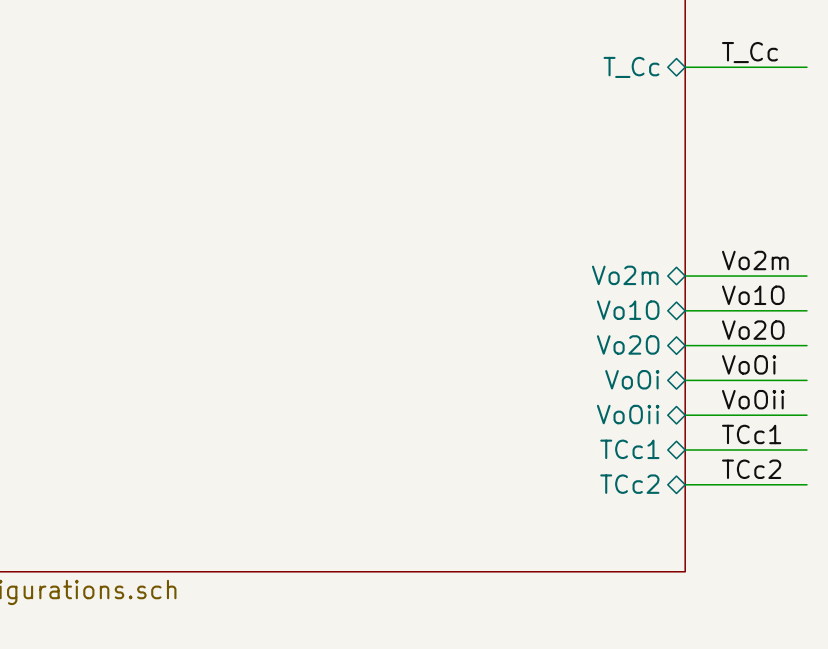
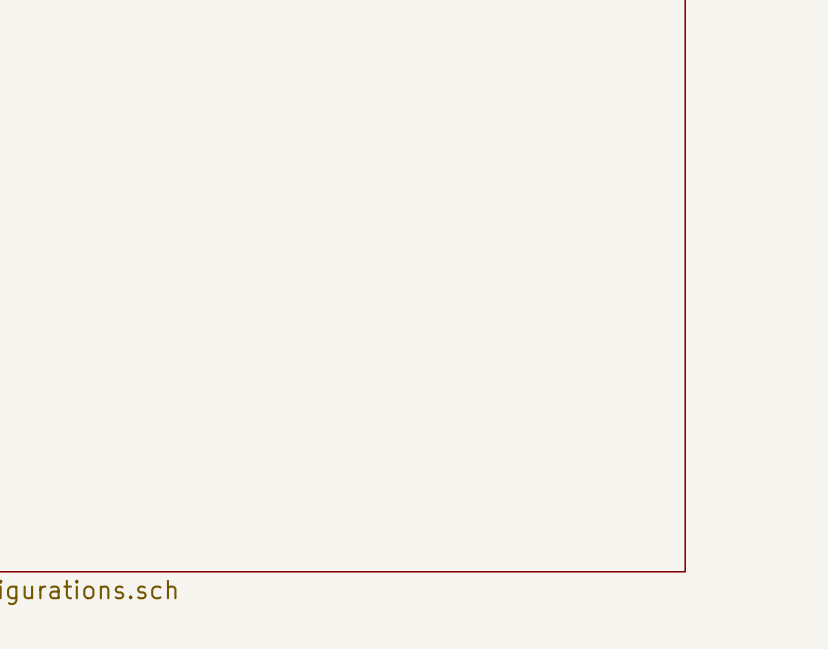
label: T_Cc (749, 52) -> none
sheet pin: T_Cc (631, 67) -> none
wire: (685, 67) (806, 67) -> none
label: Vo2m (755, 260) -> none
sheet pin: Vo2m (625, 275) -> none
wire: (685, 276) (806, 276) -> none
label: Vo1O (753, 295) -> none
sheet pin: Vo1O (628, 310) -> none
wire: (685, 310) (806, 310) -> none
label: Vo2O (753, 330) -> none
sheet pin: Vo2O (628, 344) -> none
wire: (685, 345) (806, 345) -> none
label: VoOi (749, 364) -> none
sheet pin: VoOi (632, 379) -> none
wire: (685, 380) (806, 380) -> none
label: VoOii (753, 399) -> none
sheet pin: VoOii (628, 414) -> none
wire: (685, 415) (806, 415) -> none
label: TCc1 (751, 434) -> none
sheet pin: TCc1 (629, 449) -> none
wire: (685, 449) (806, 449) -> none
label: TCc2 (751, 469) -> none
sheet pin: TCc2 (629, 484) -> none
wire: (685, 484) (806, 484) -> none

